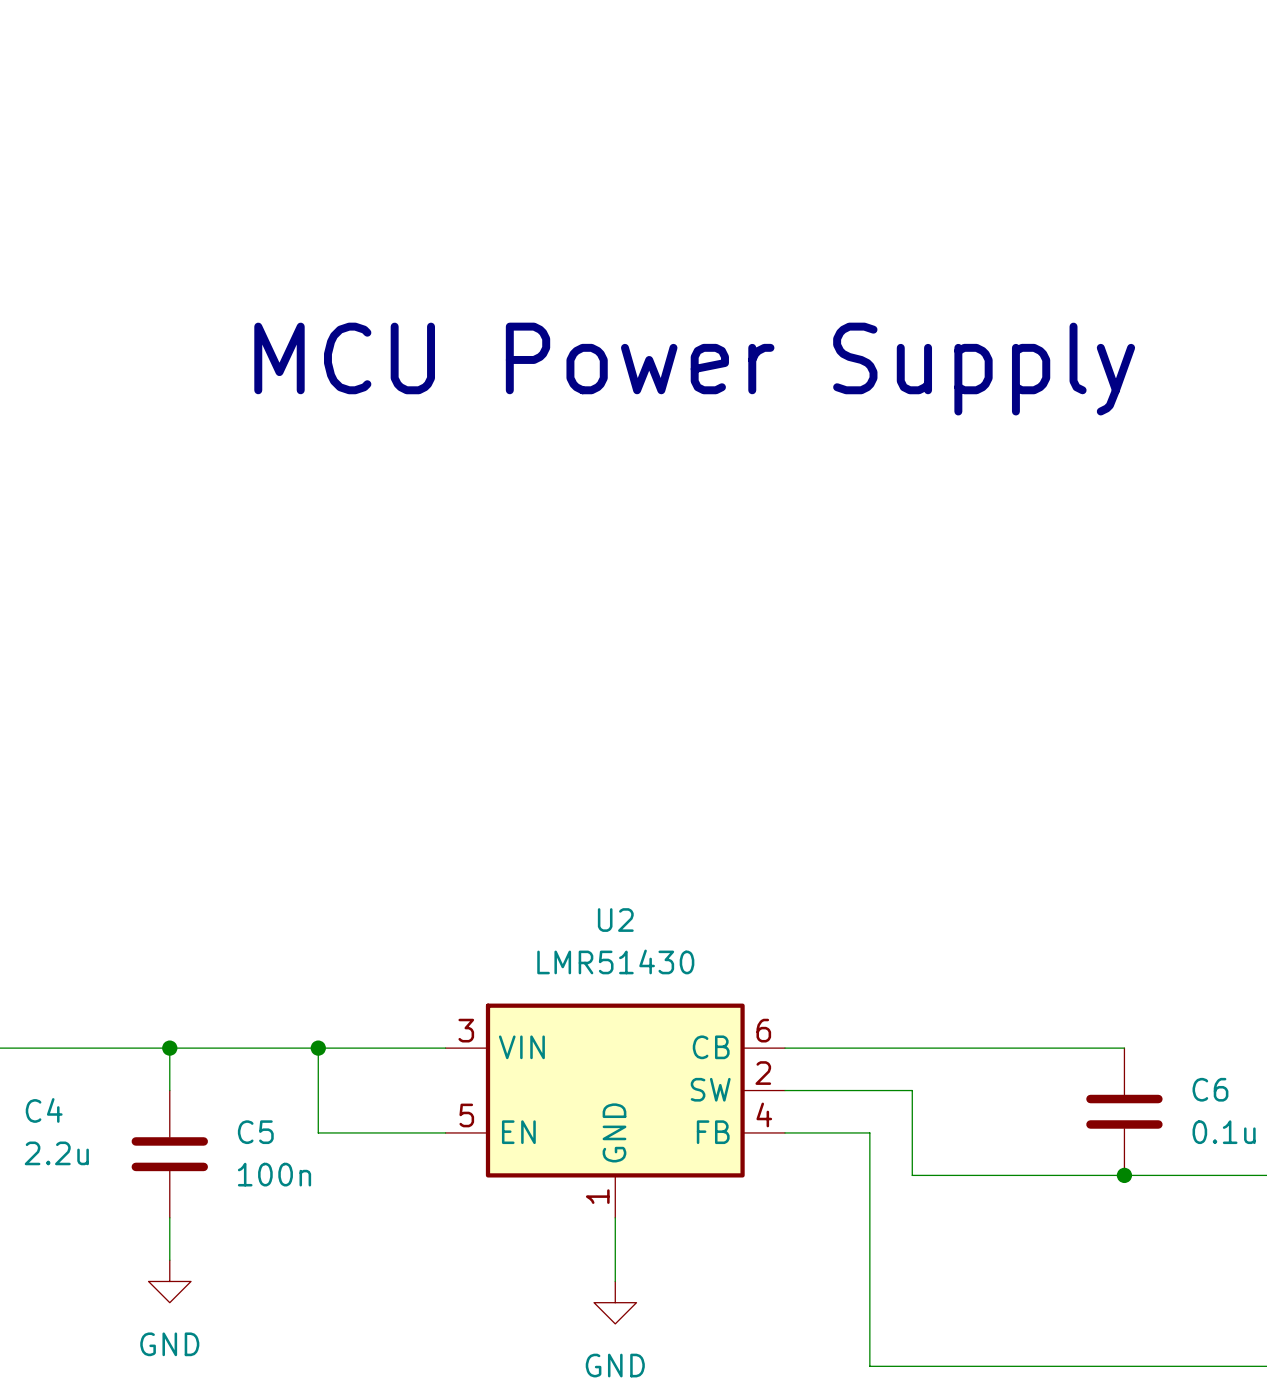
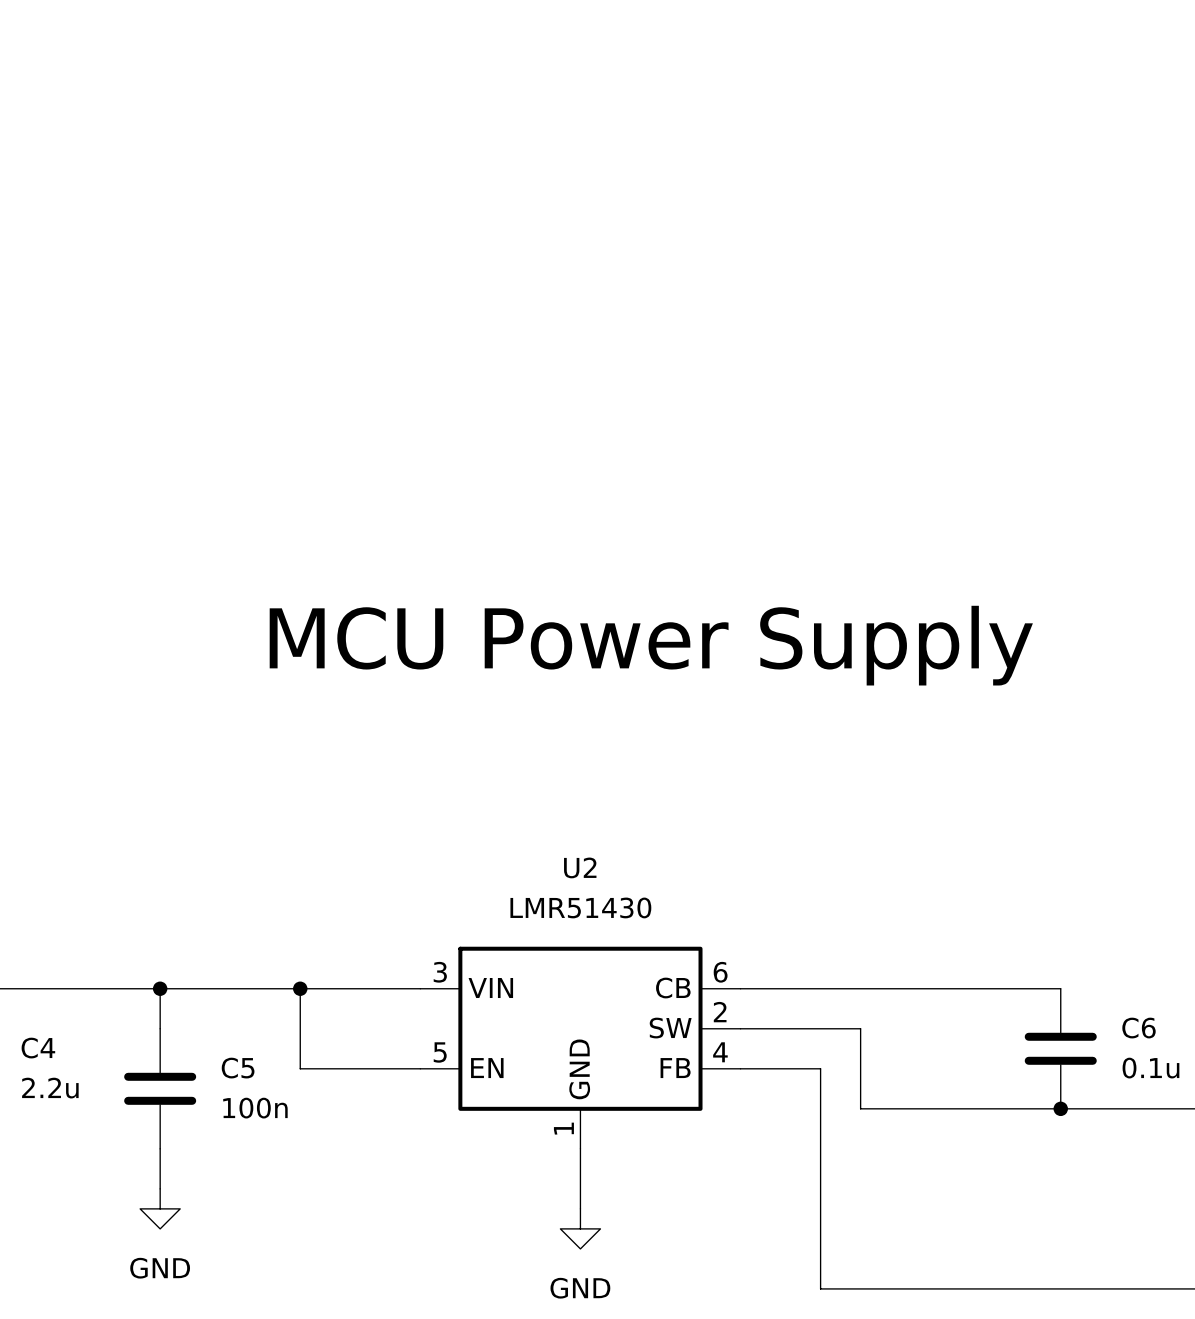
text position: MCU Power Supply (694, 369) -> MCU Power Supply (651, 645)

